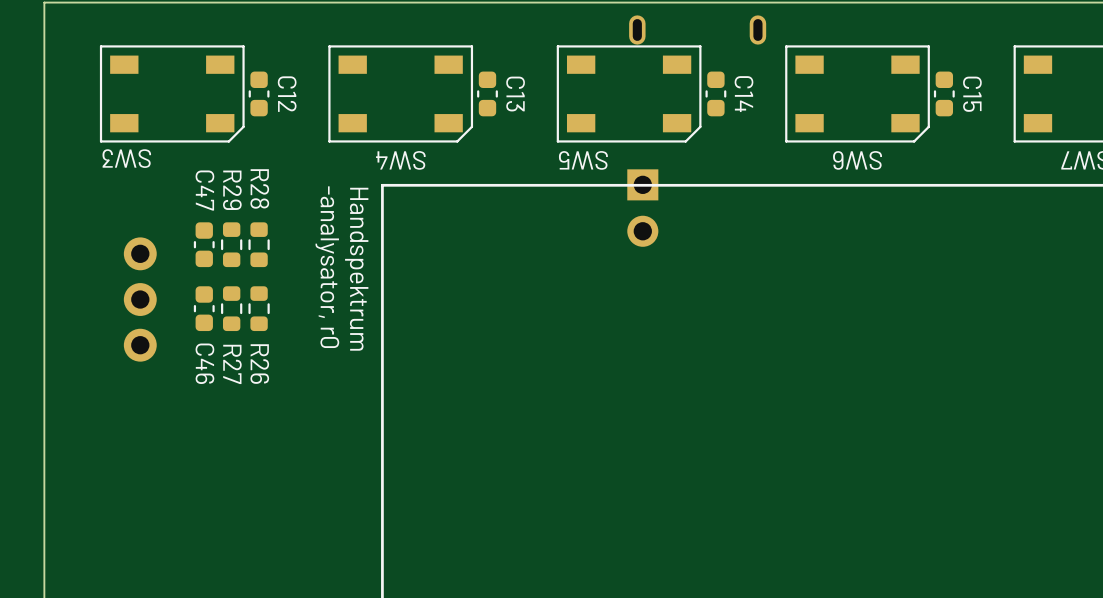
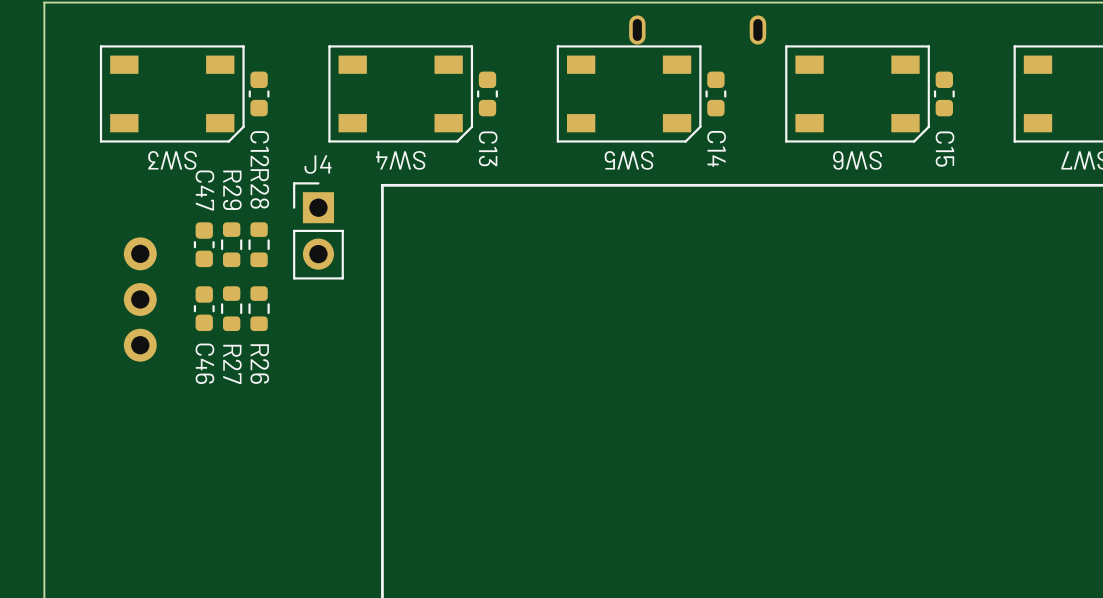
C12 name position: C12 (287, 94) -> C12 (259, 148)
C13 name position: C13 (515, 94) -> C13 (488, 148)
C14 name position: C14 (743, 94) -> C14 (716, 148)
C15 name position: C15 (972, 94) -> C15 (945, 149)
SW3 name position: SW3 (126, 158) -> SW3 (172, 160)
SW5 name position: SW5 (583, 160) -> SW5 (629, 160)
J4 side: top (642, 208) -> bottom (318, 230)
text: -analysator, r0 (327, 267) -> none
text: Handspektrum (356, 269) -> none

